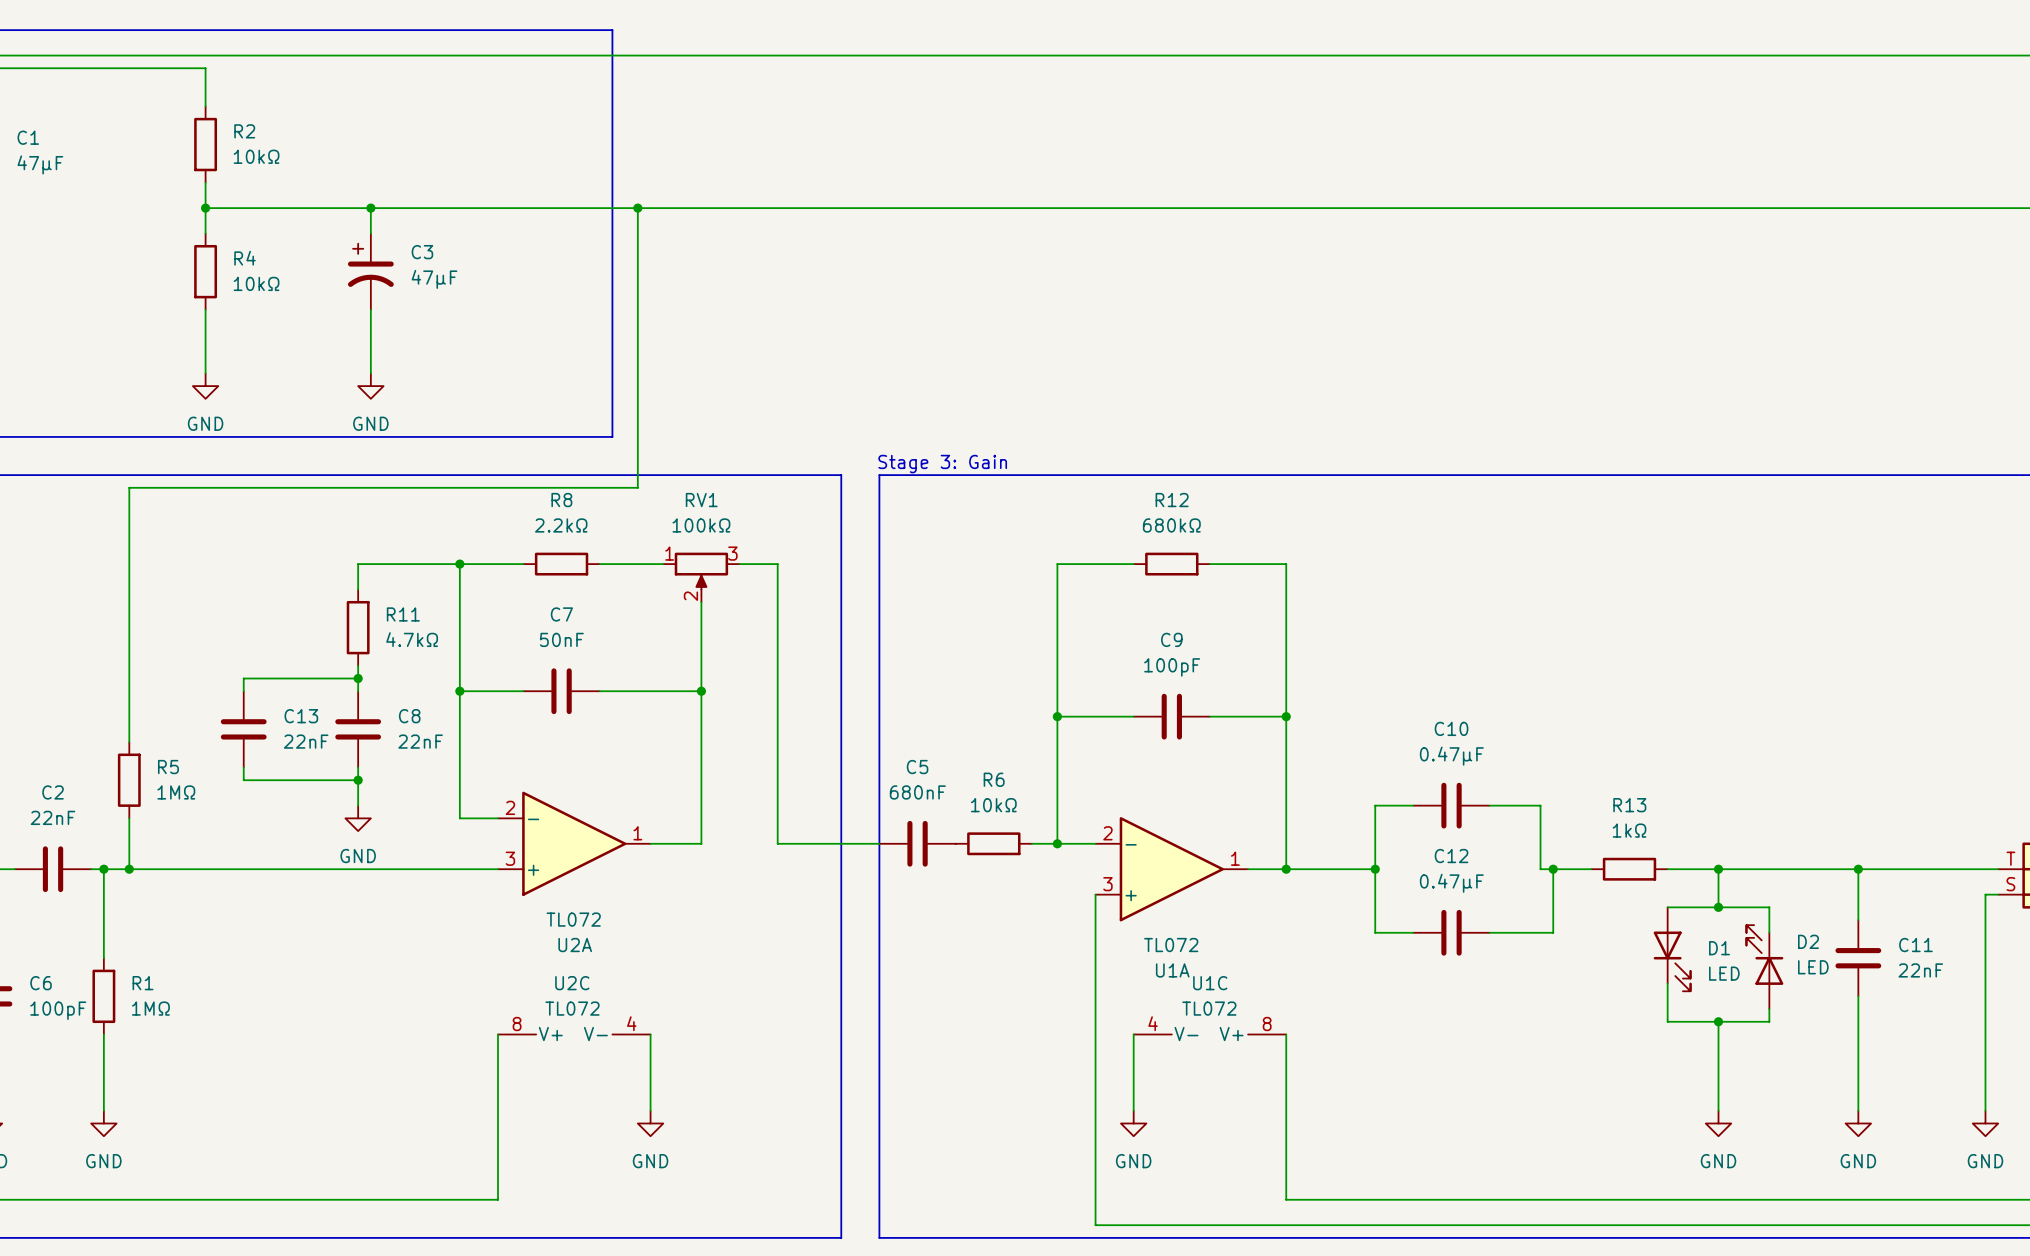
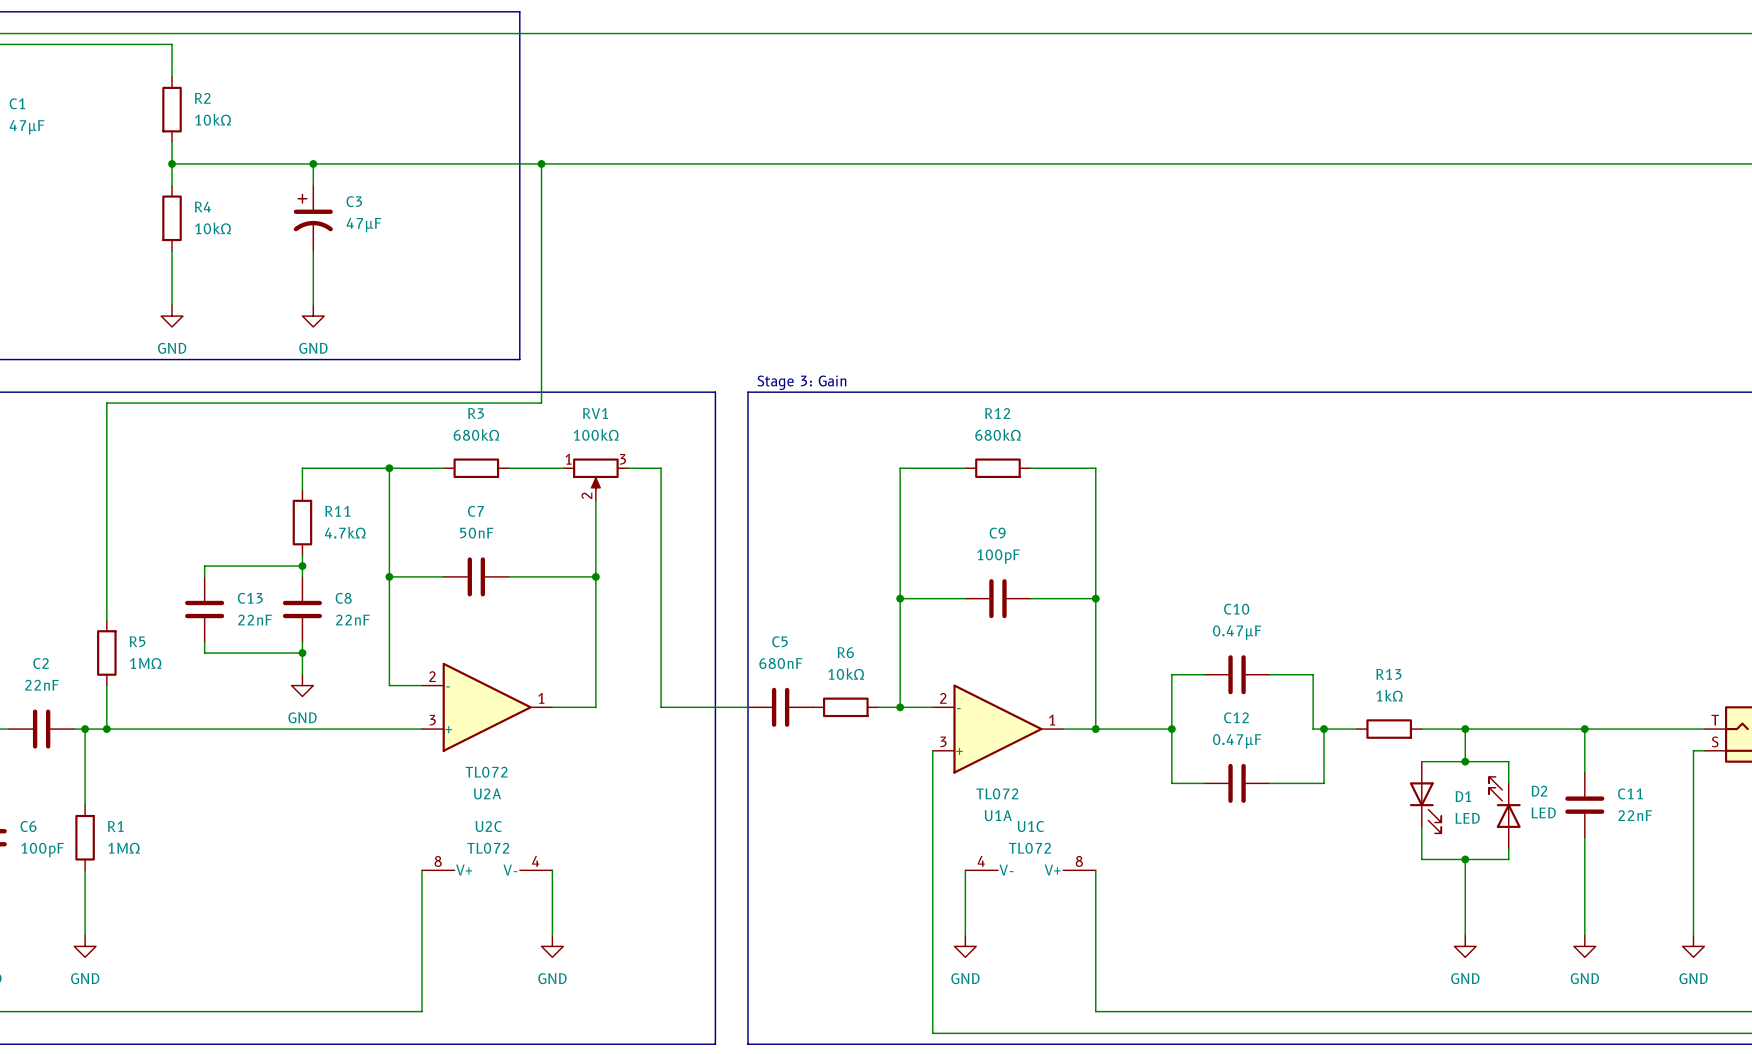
R8 name: R8 (561, 500) -> R3 (476, 413)
R8 value: 2.2kΩ (561, 525) -> 680kΩ (476, 434)

